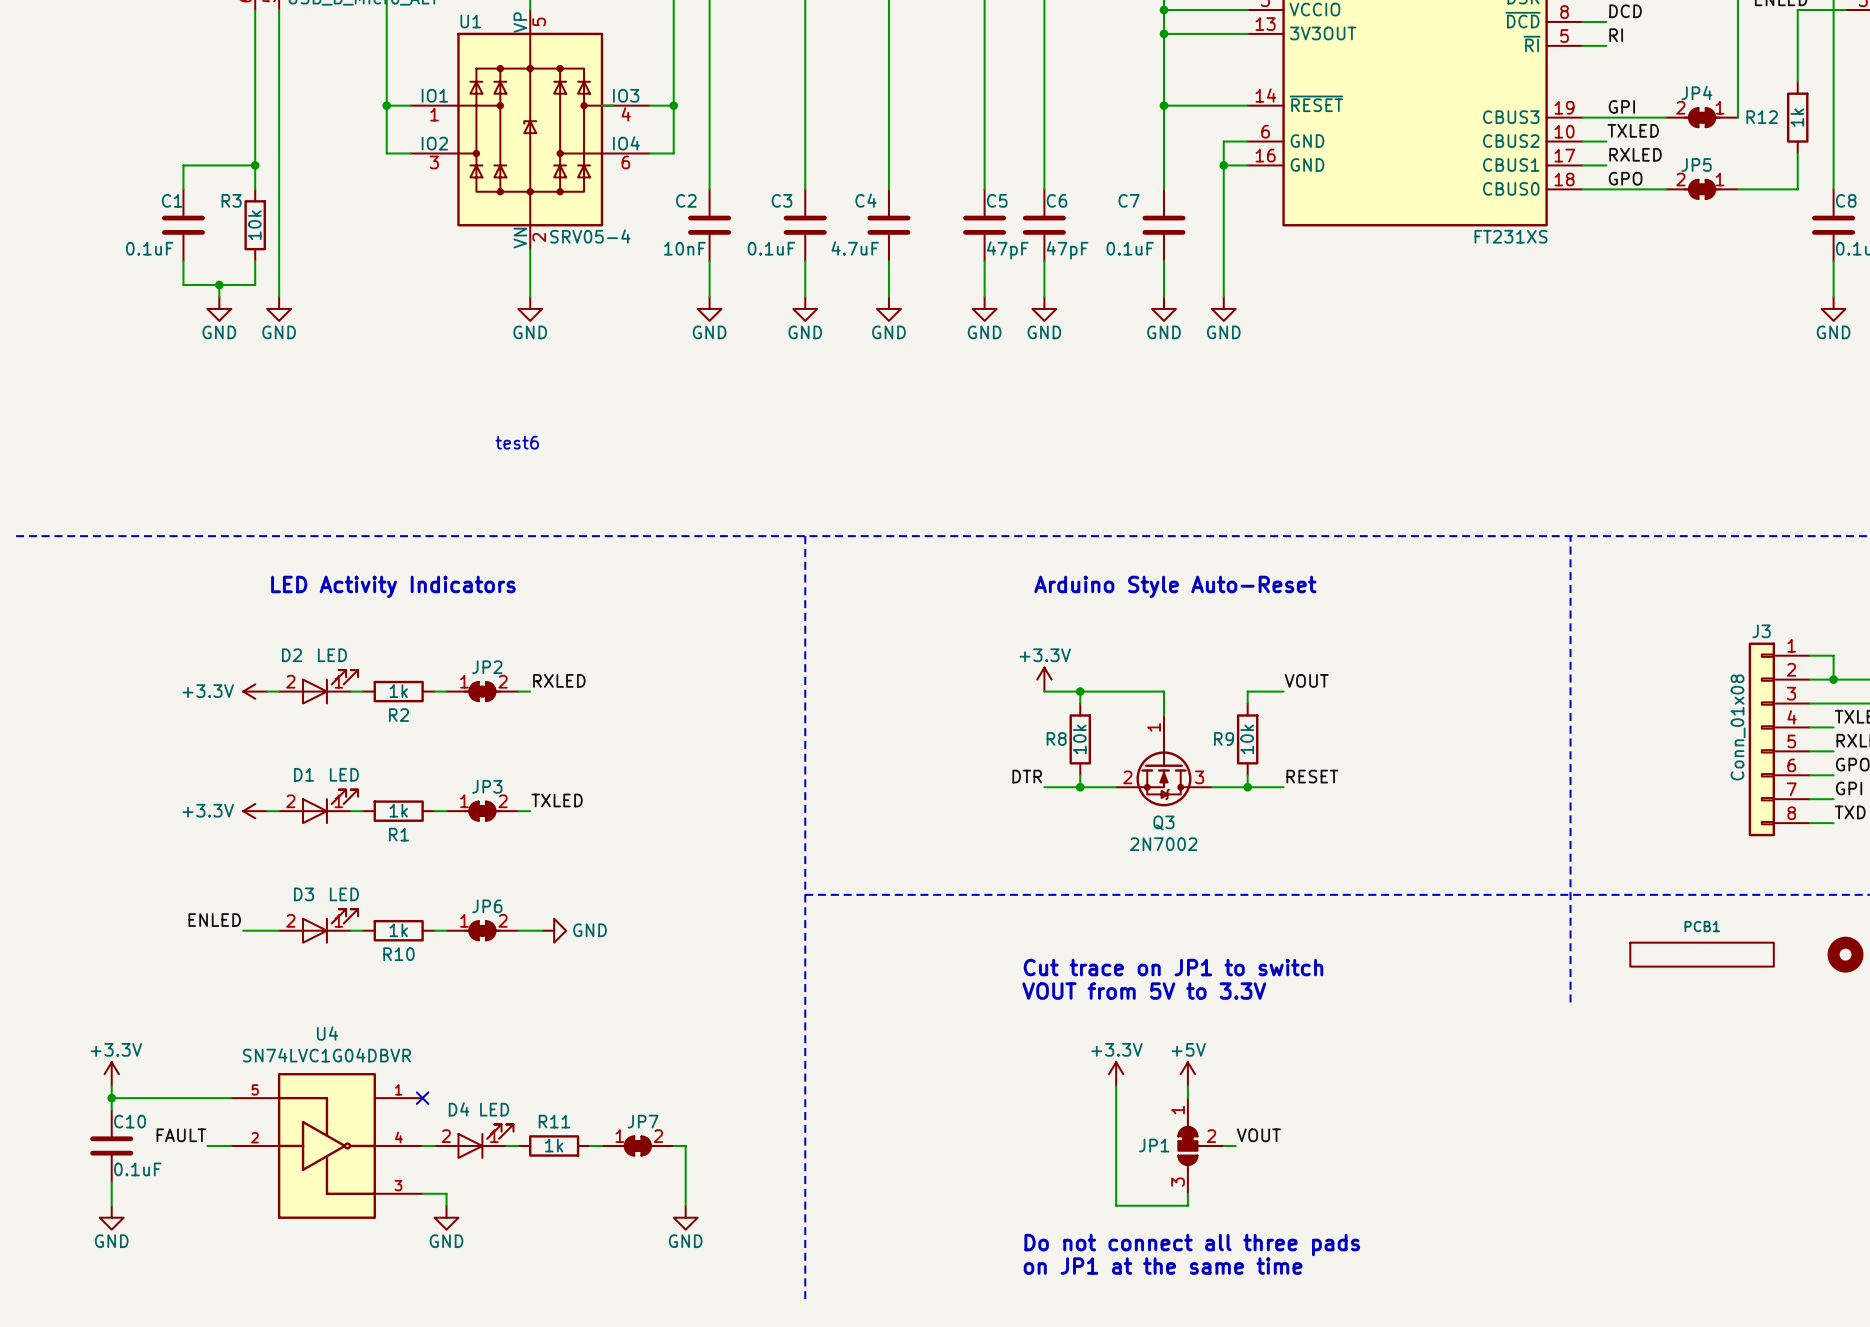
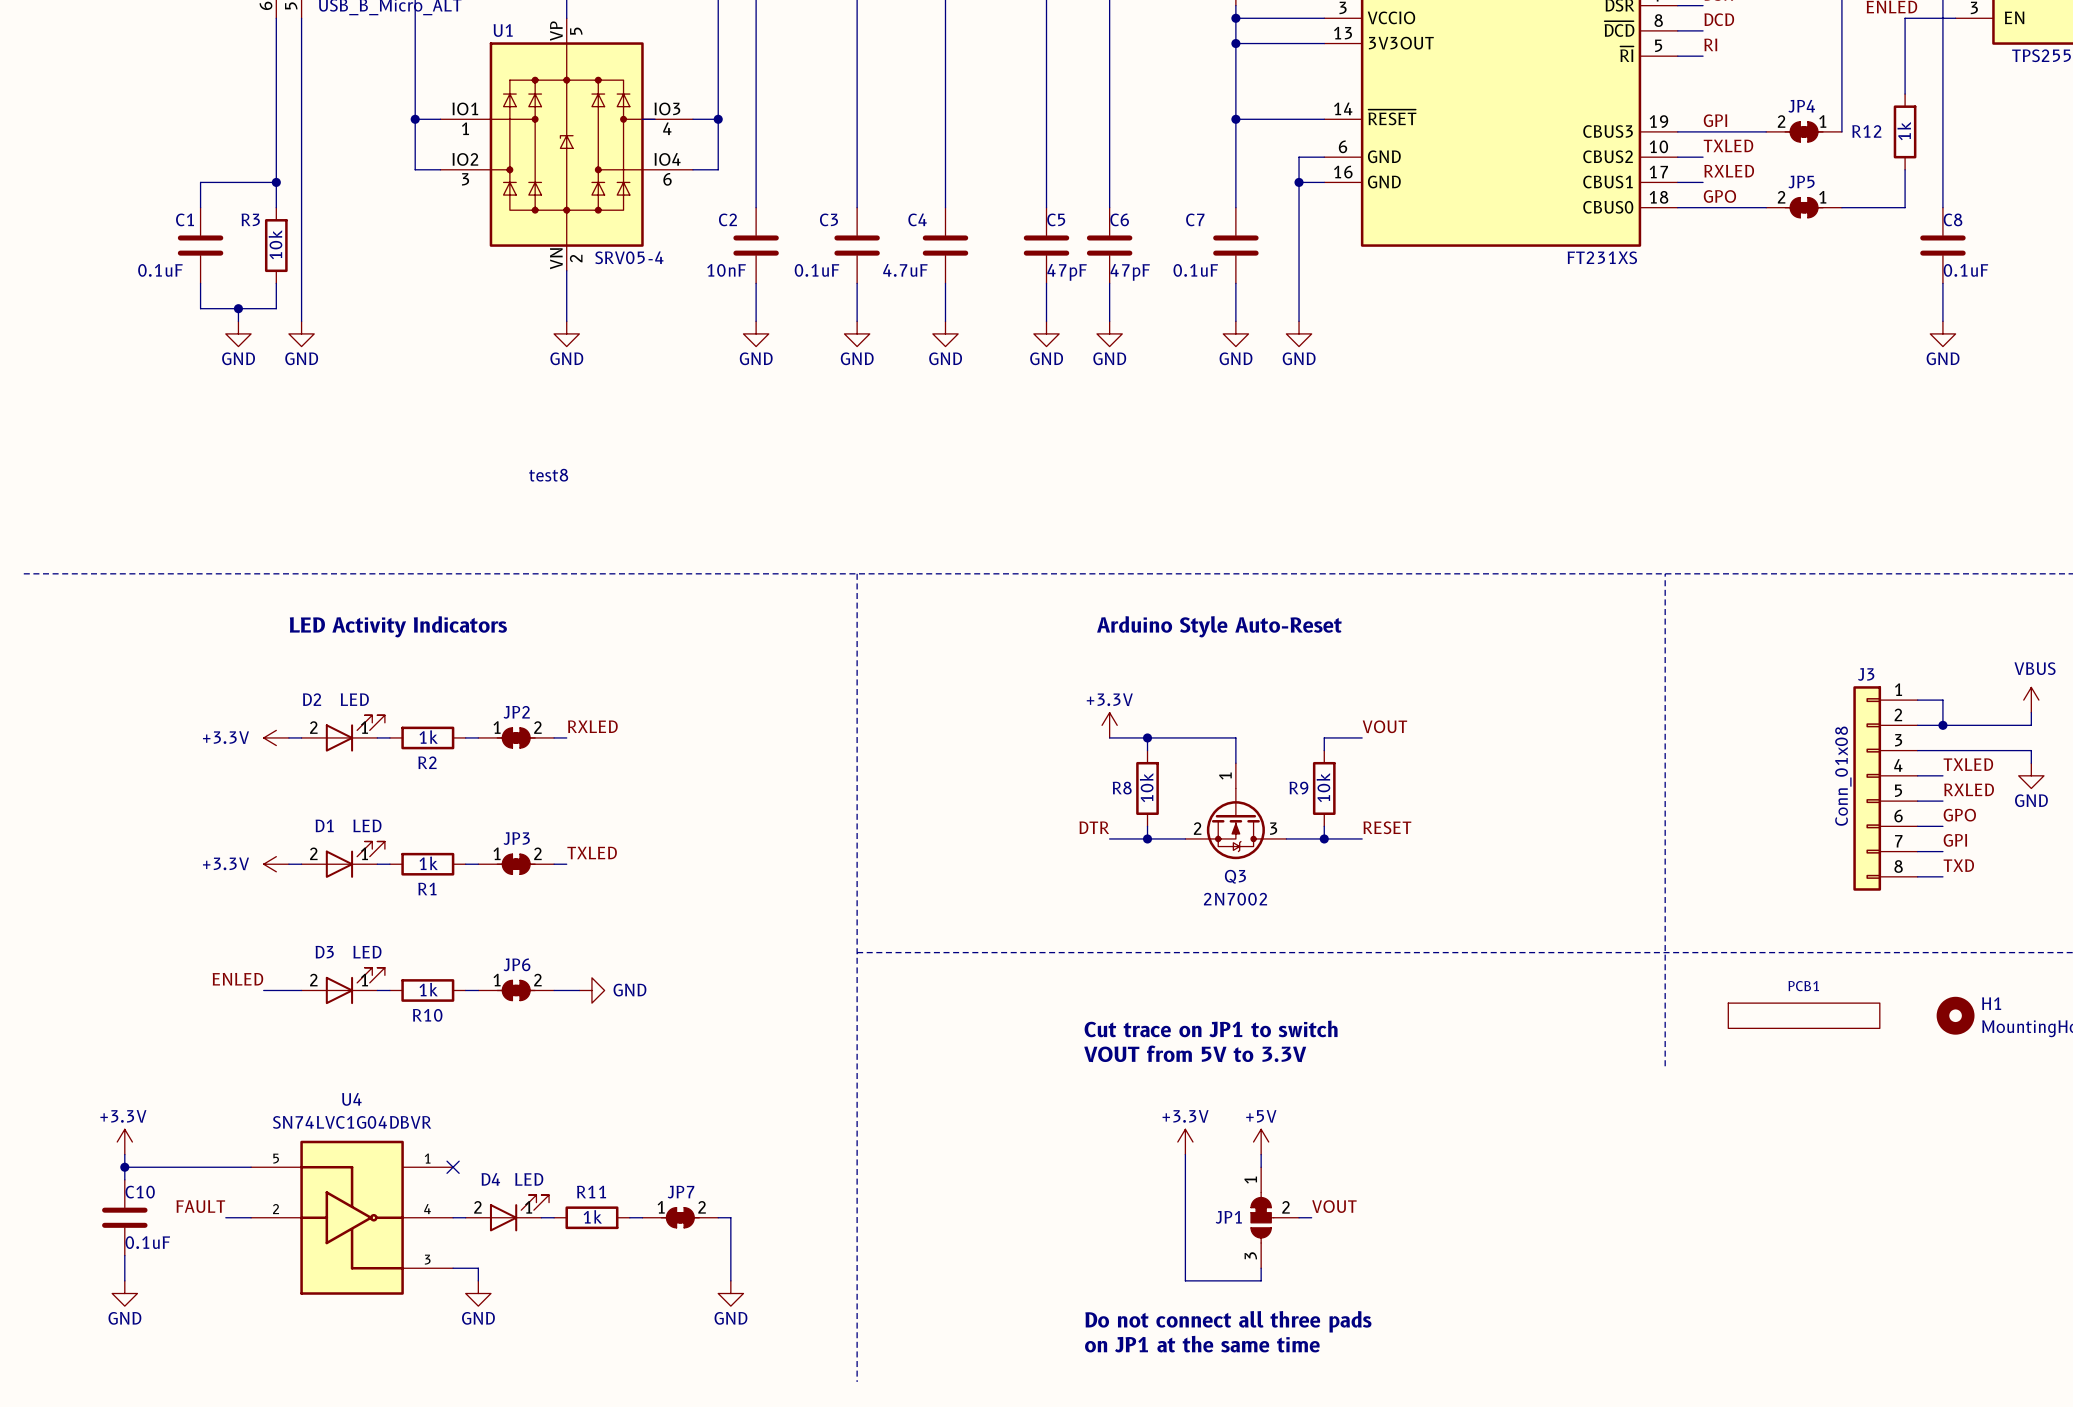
text: test6 (517, 442) -> test8 (548, 475)

